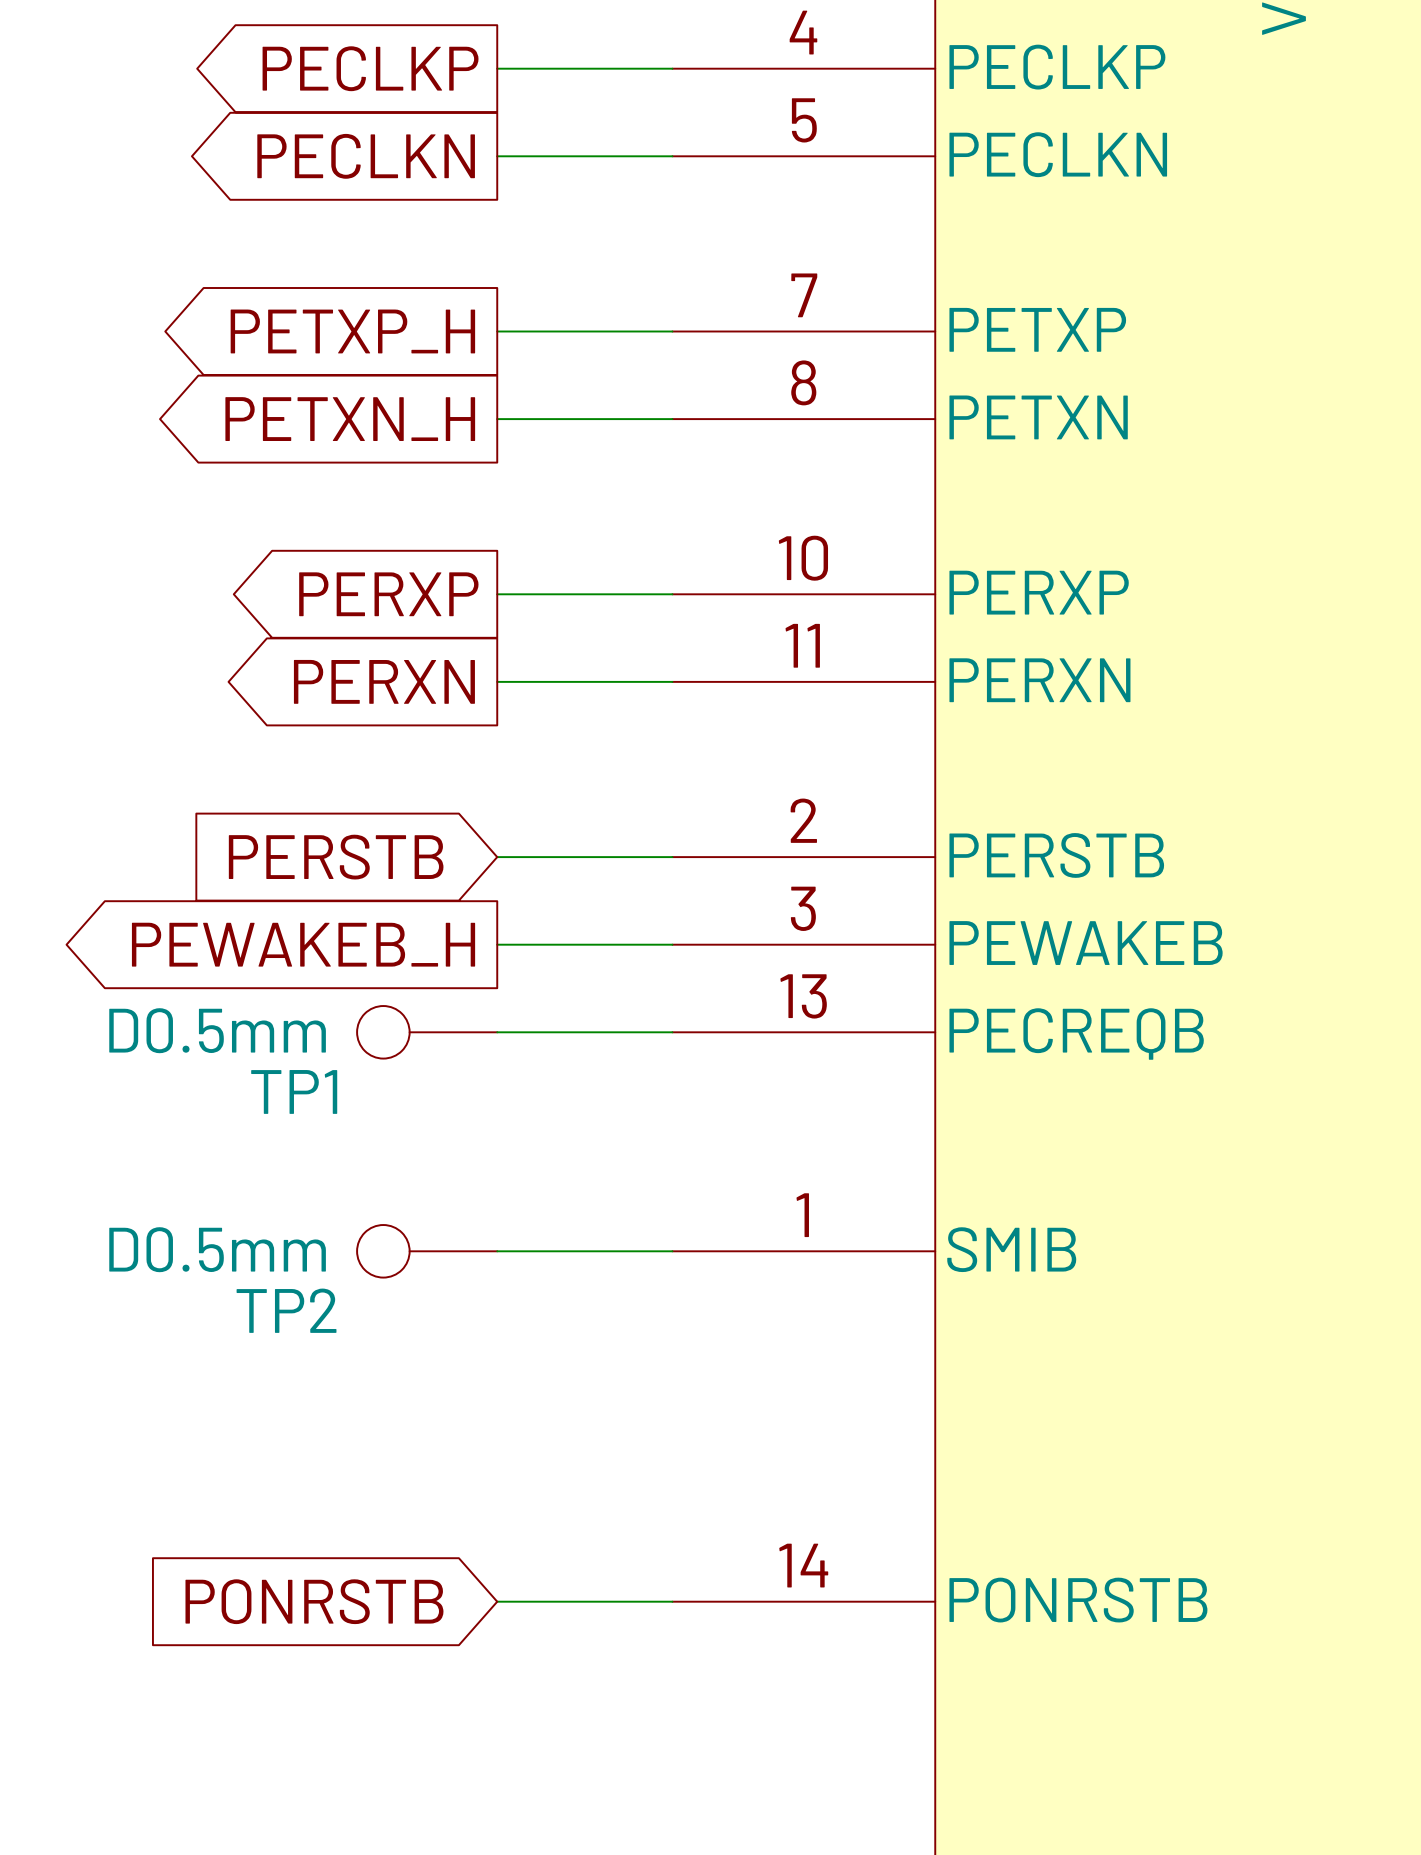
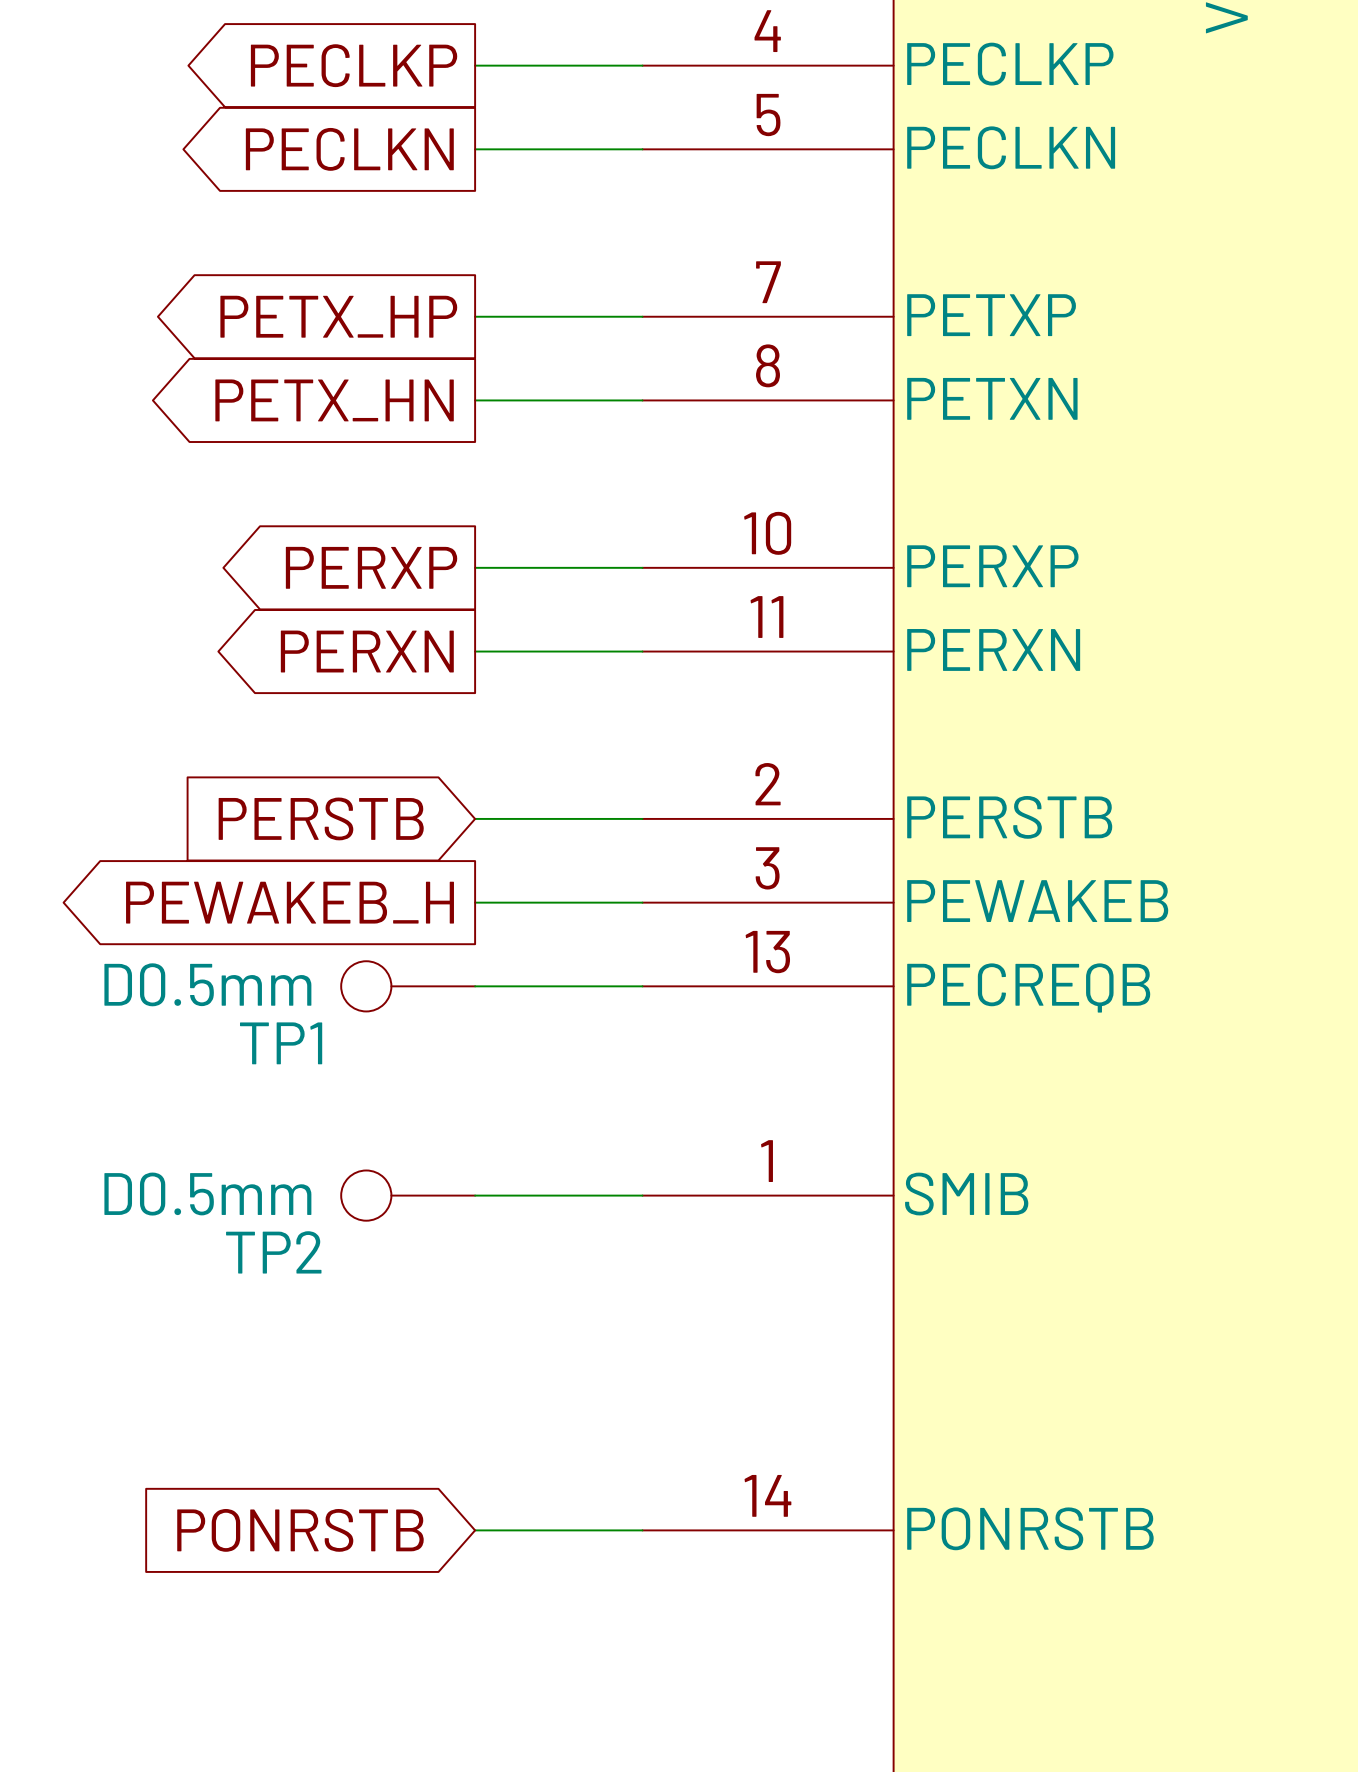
global label: PETXP_H (352, 331) -> PETX_HP (338, 316)
global label: PETXN_H (350, 419) -> PETX_HN (334, 400)

